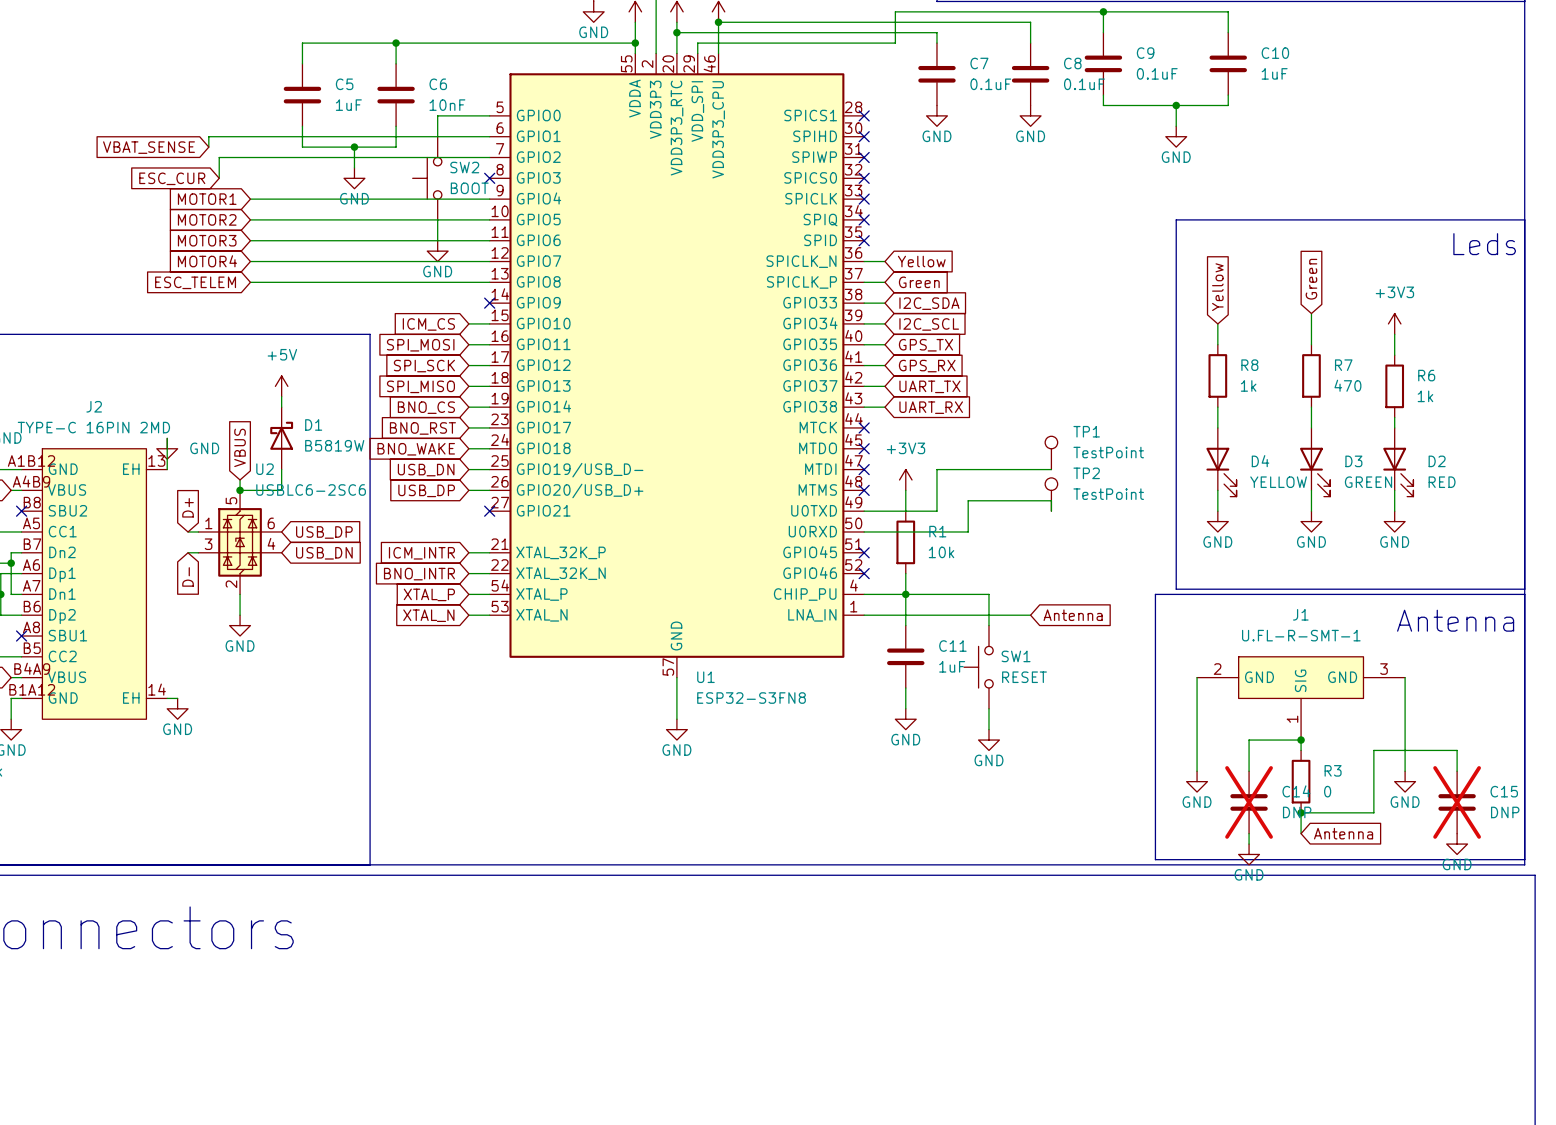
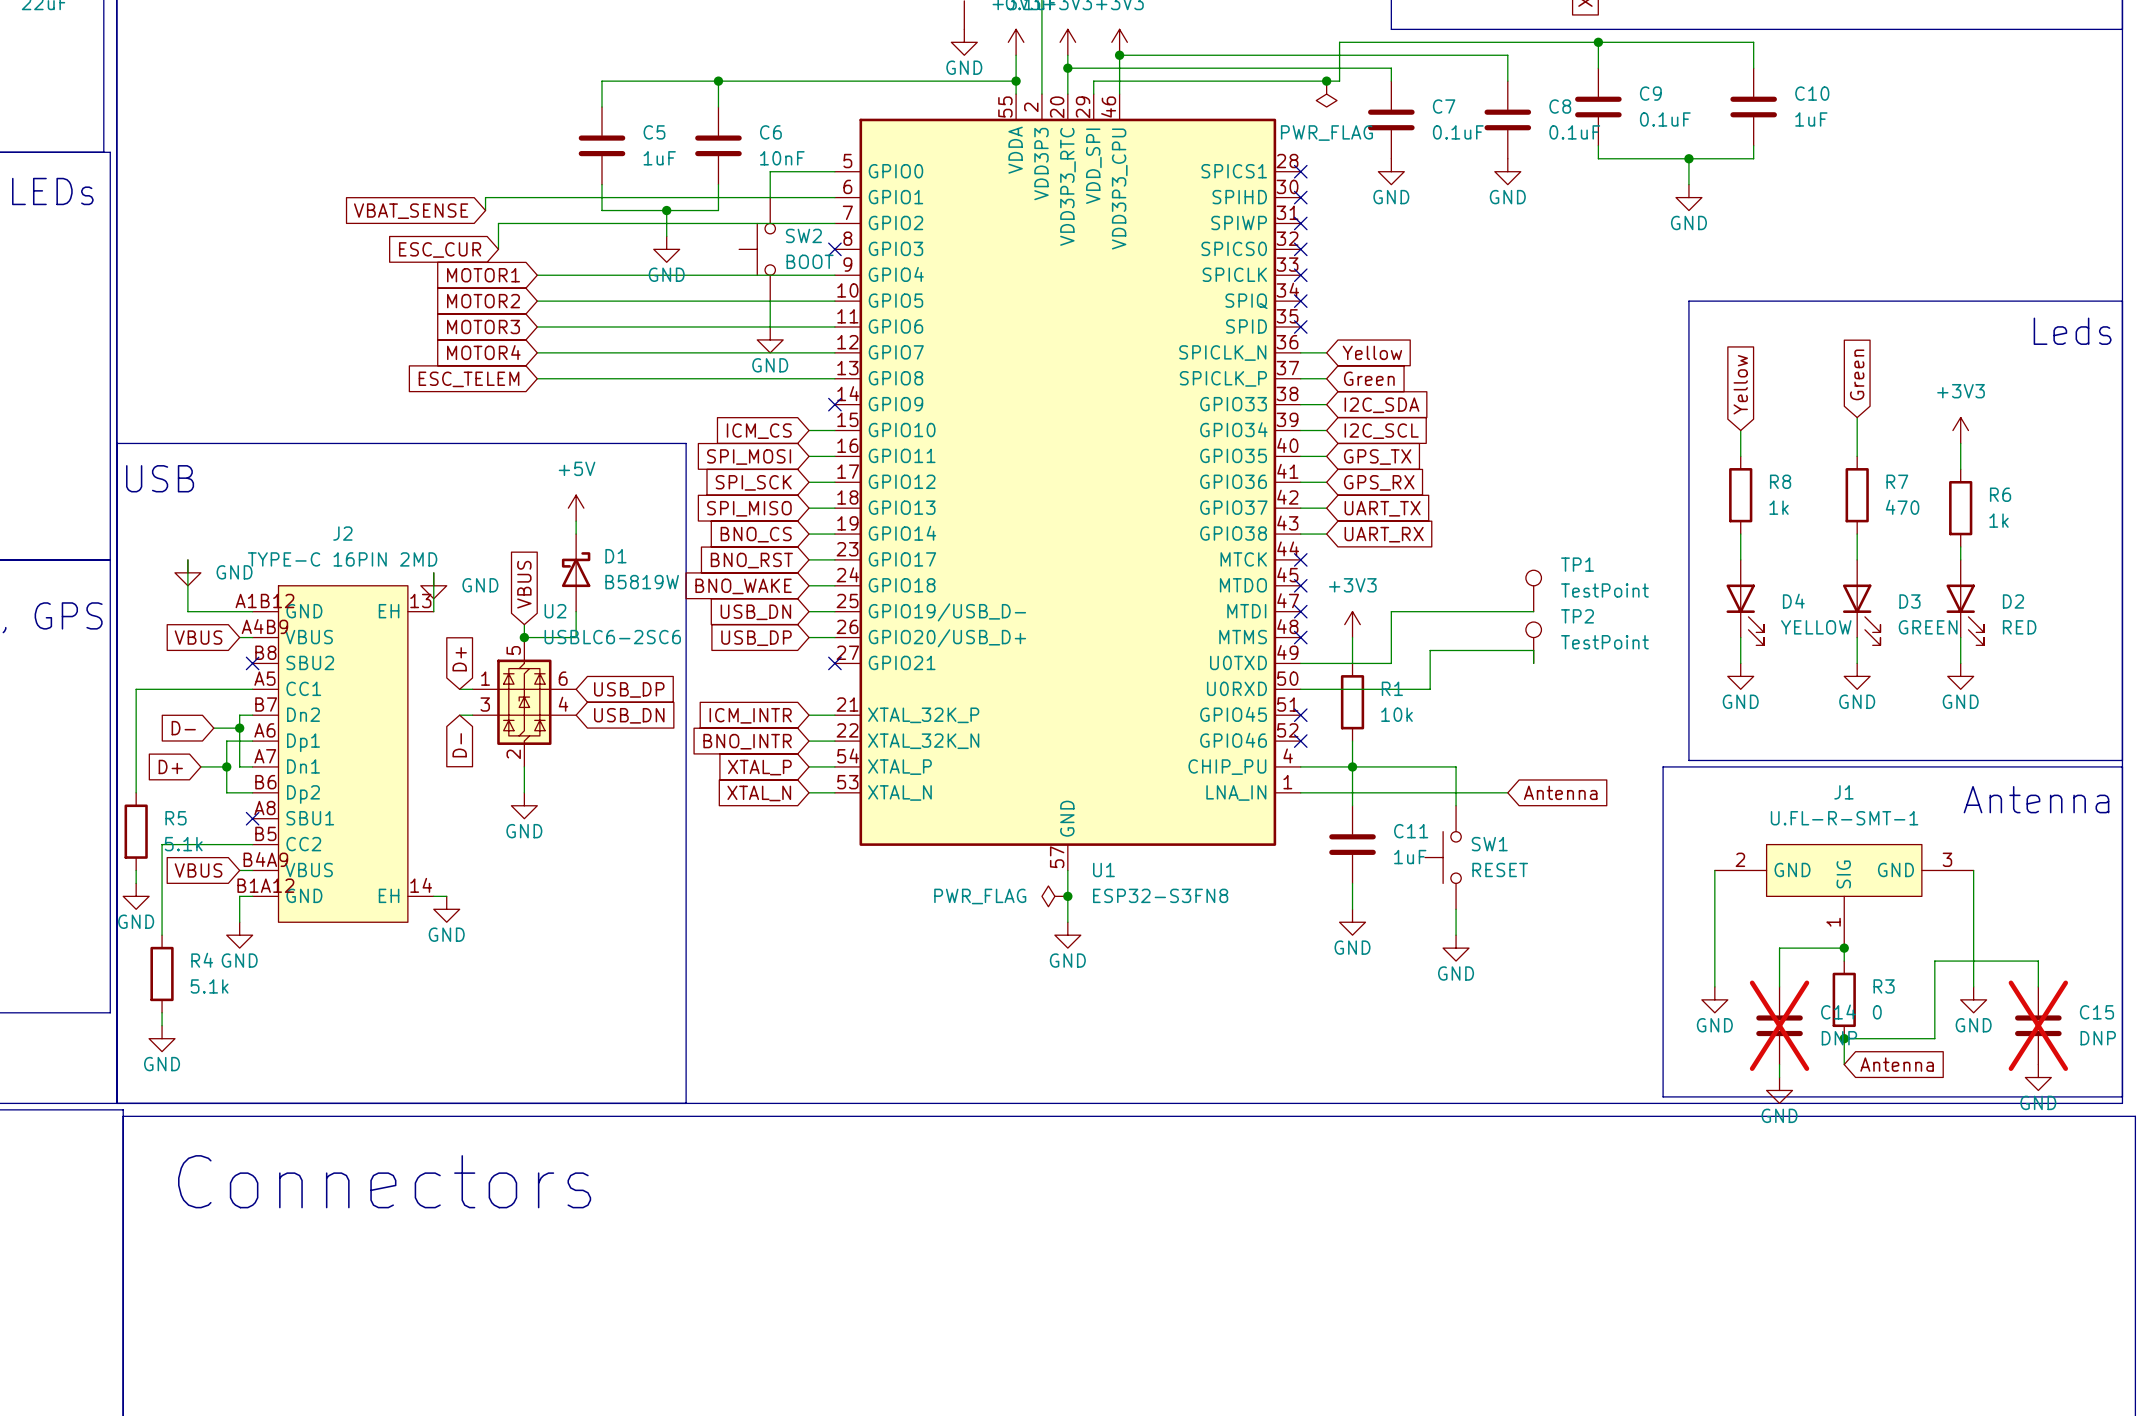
junction: none -> (1326, 81)
power symbol: none -> PWR_FLAG (1326, 94)
power symbol: none -> PWR_FLAG (1054, 896)
junction: none -> (1067, 896)

